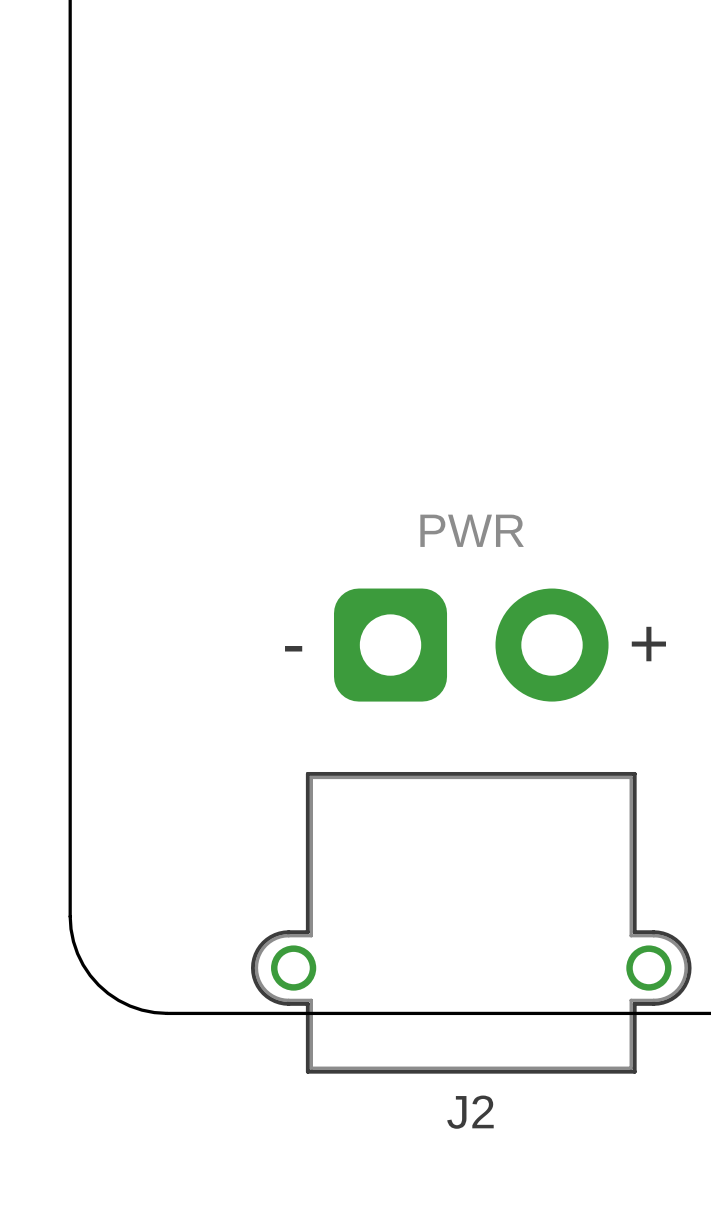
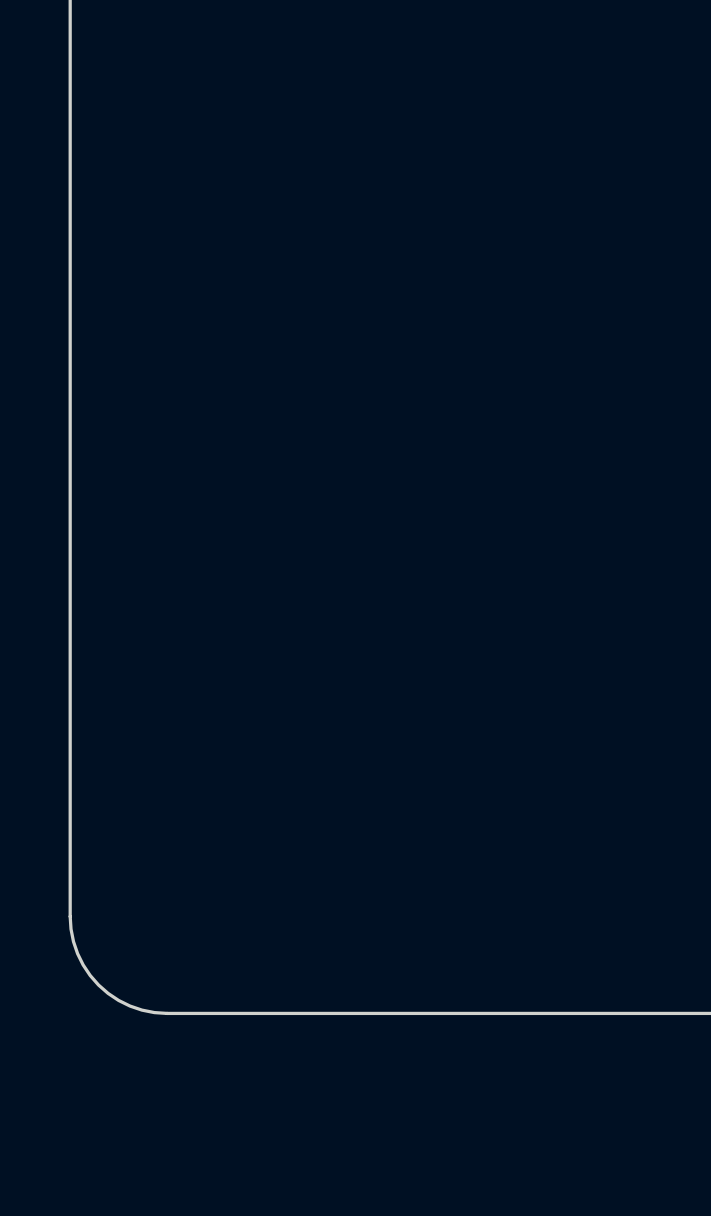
J2: PWR (471, 831) -> none

